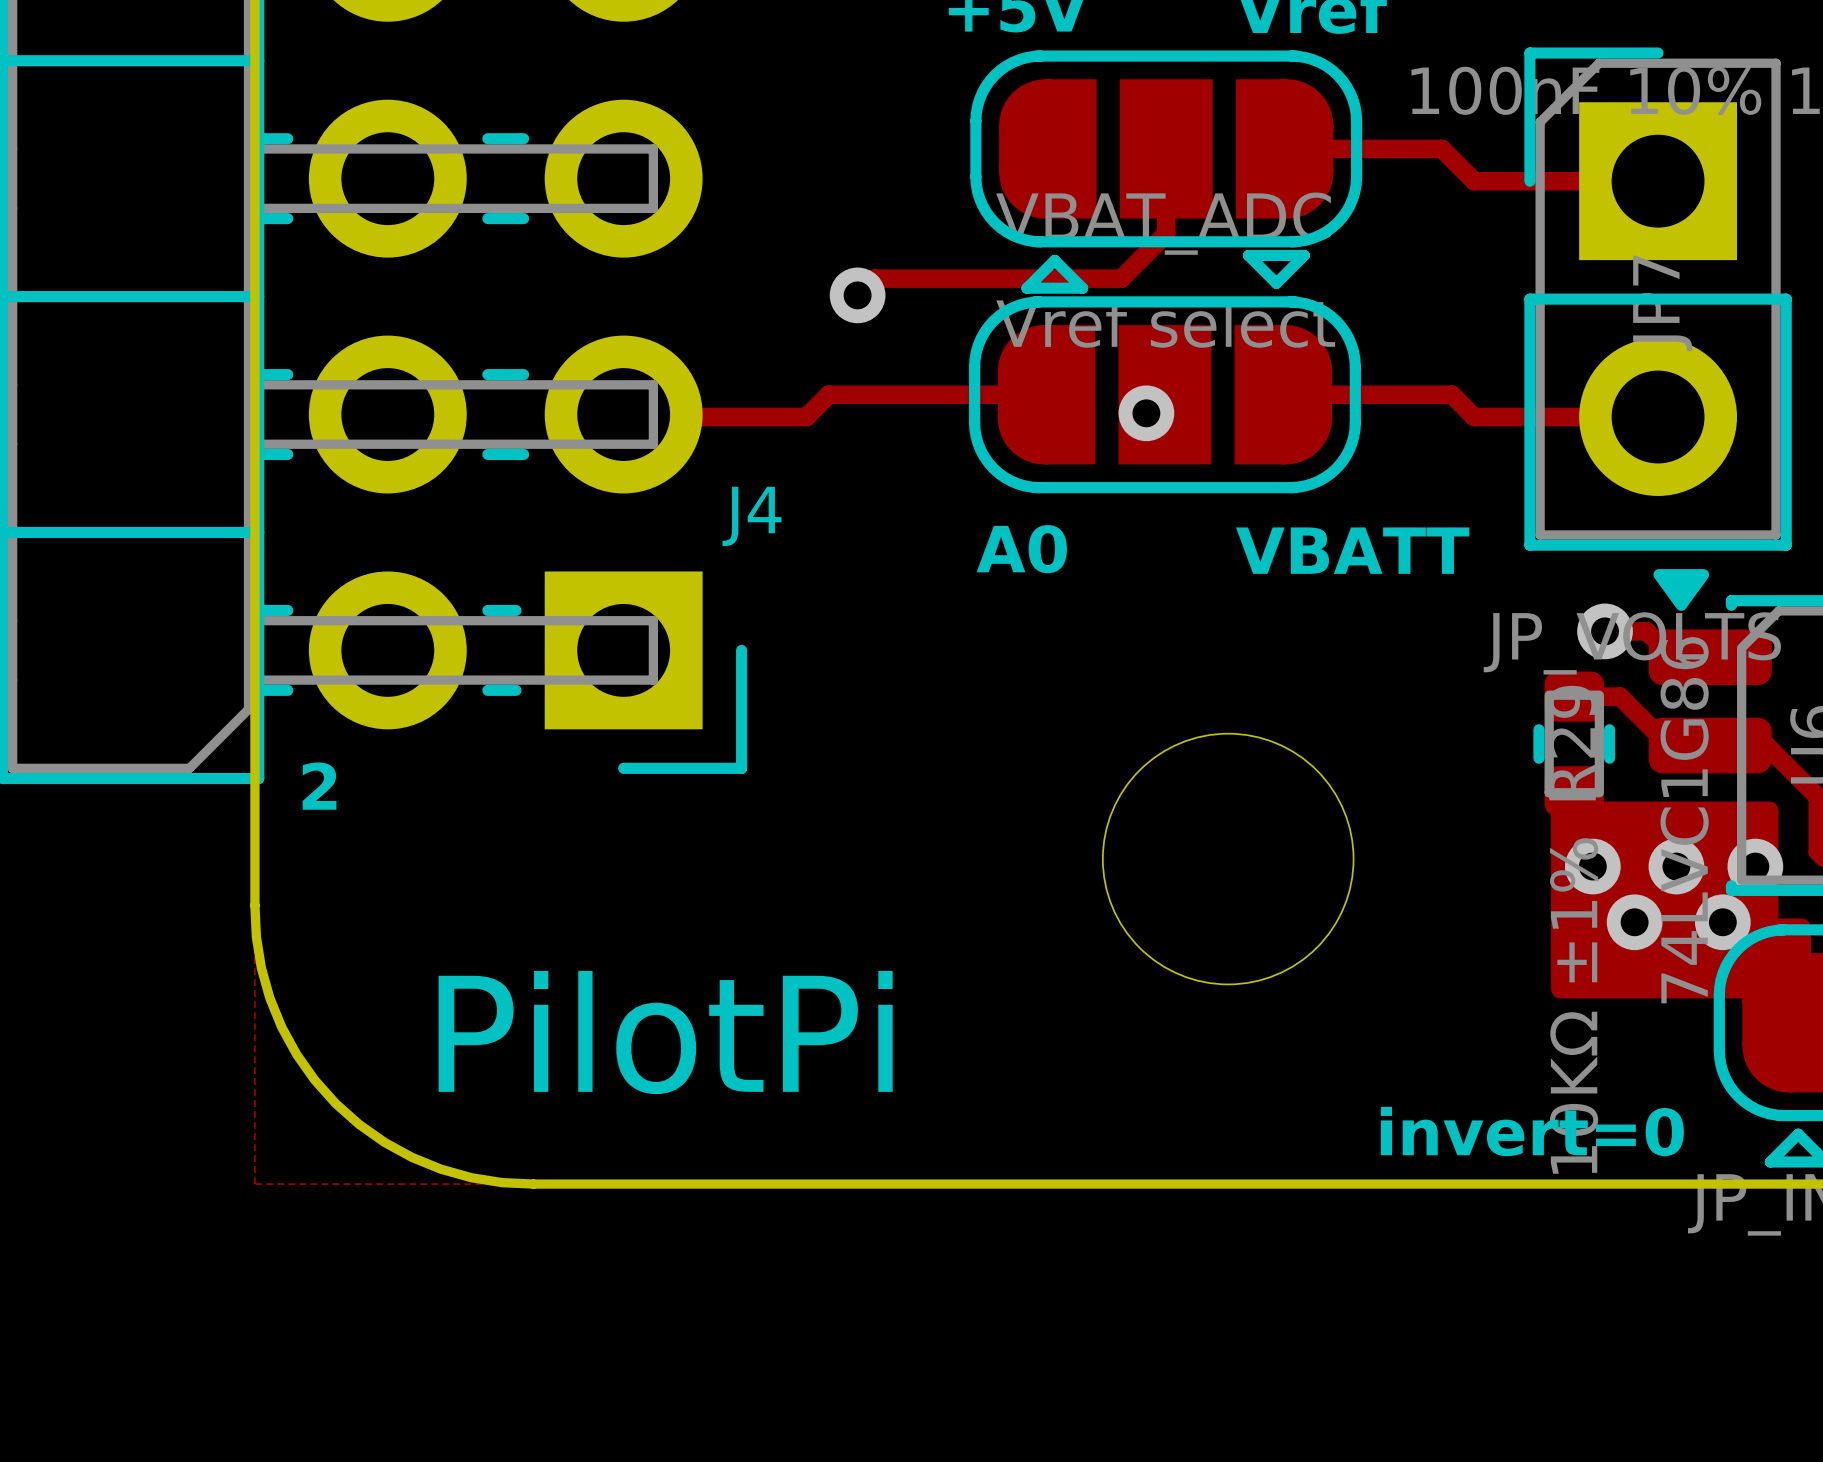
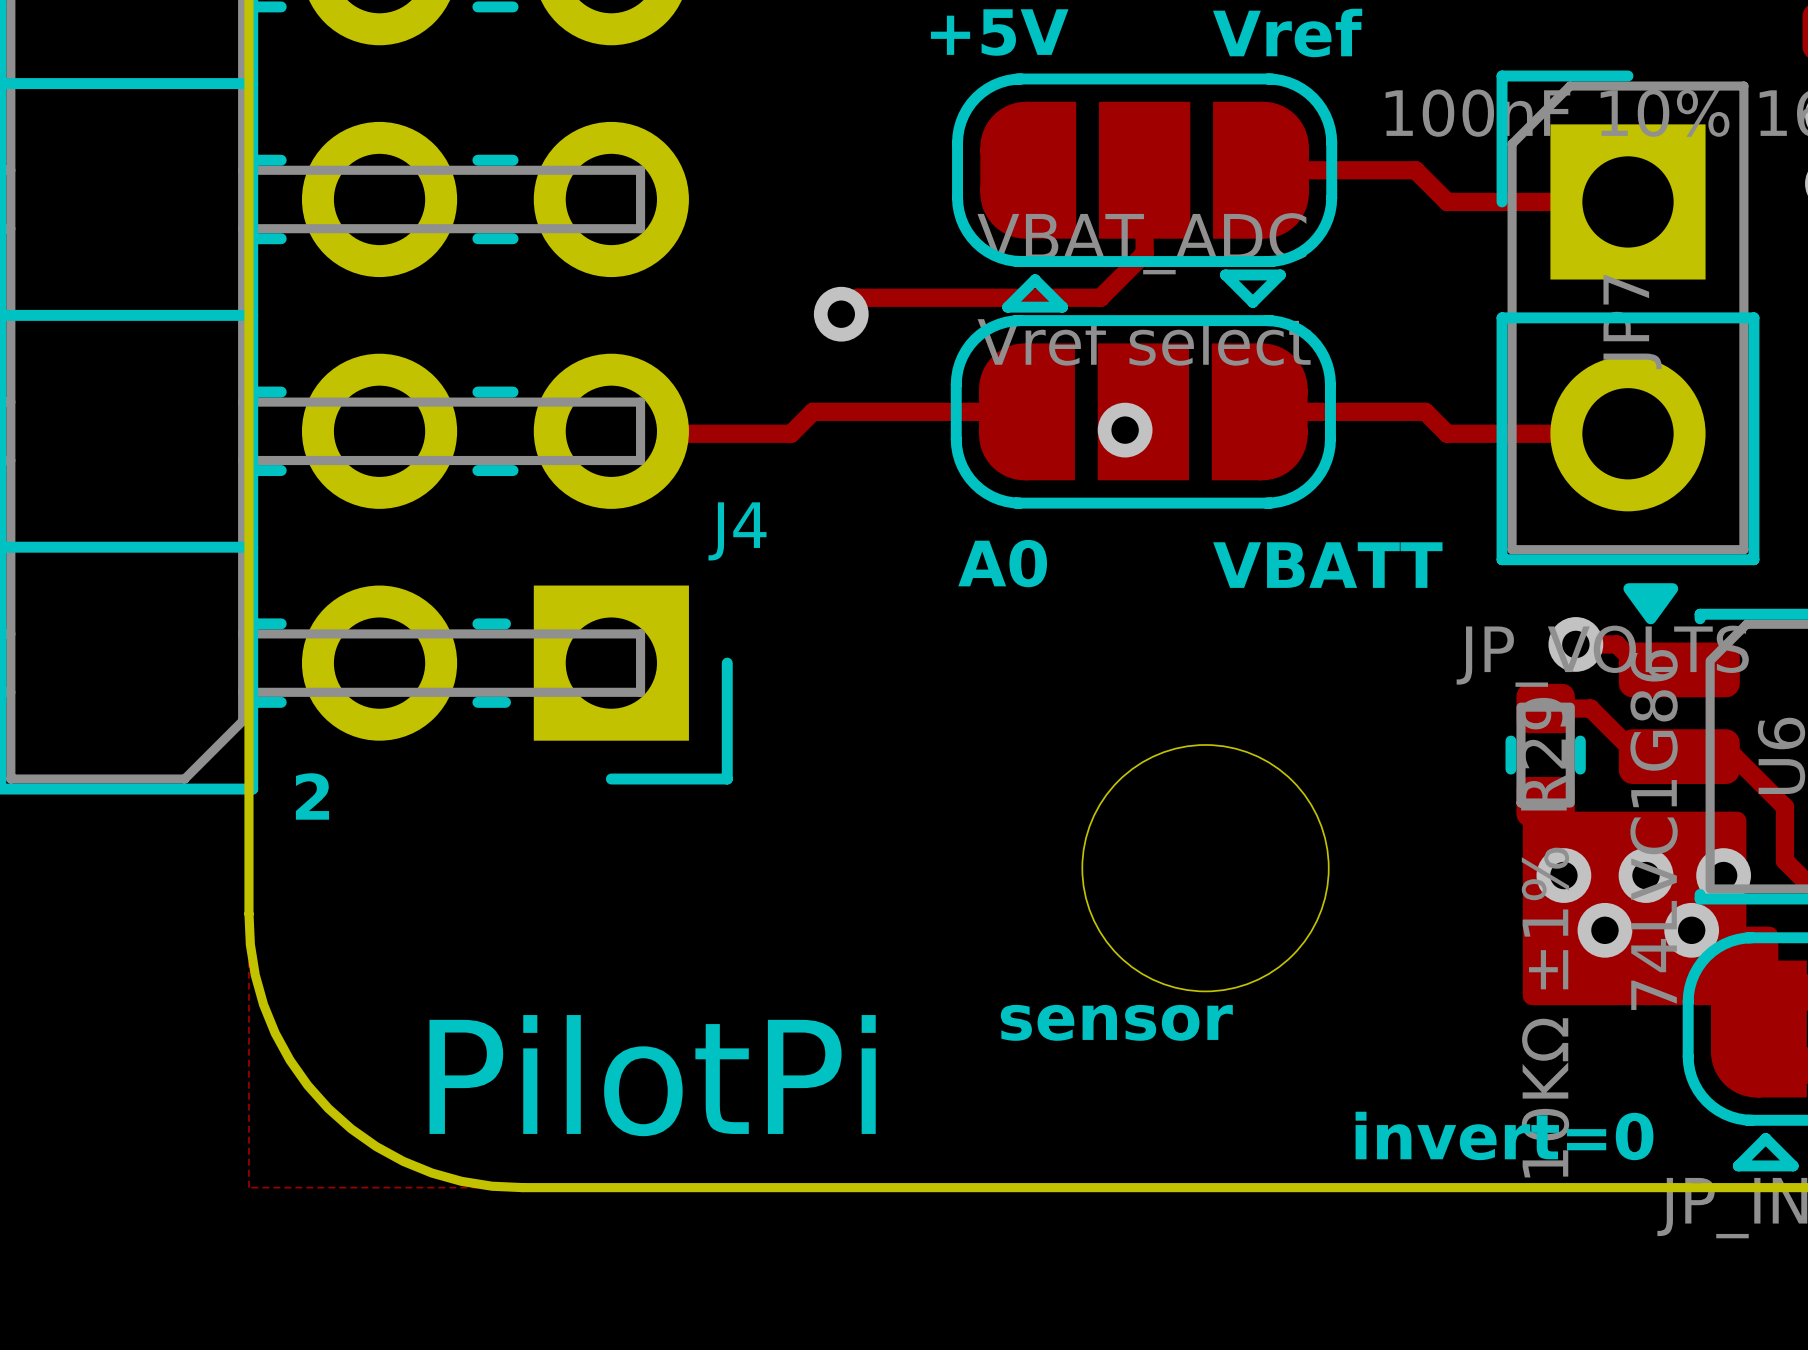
text: none -> sensor (1116, 1022)
text position: PilotPi (665, 1032) -> PilotPi (652, 1075)

